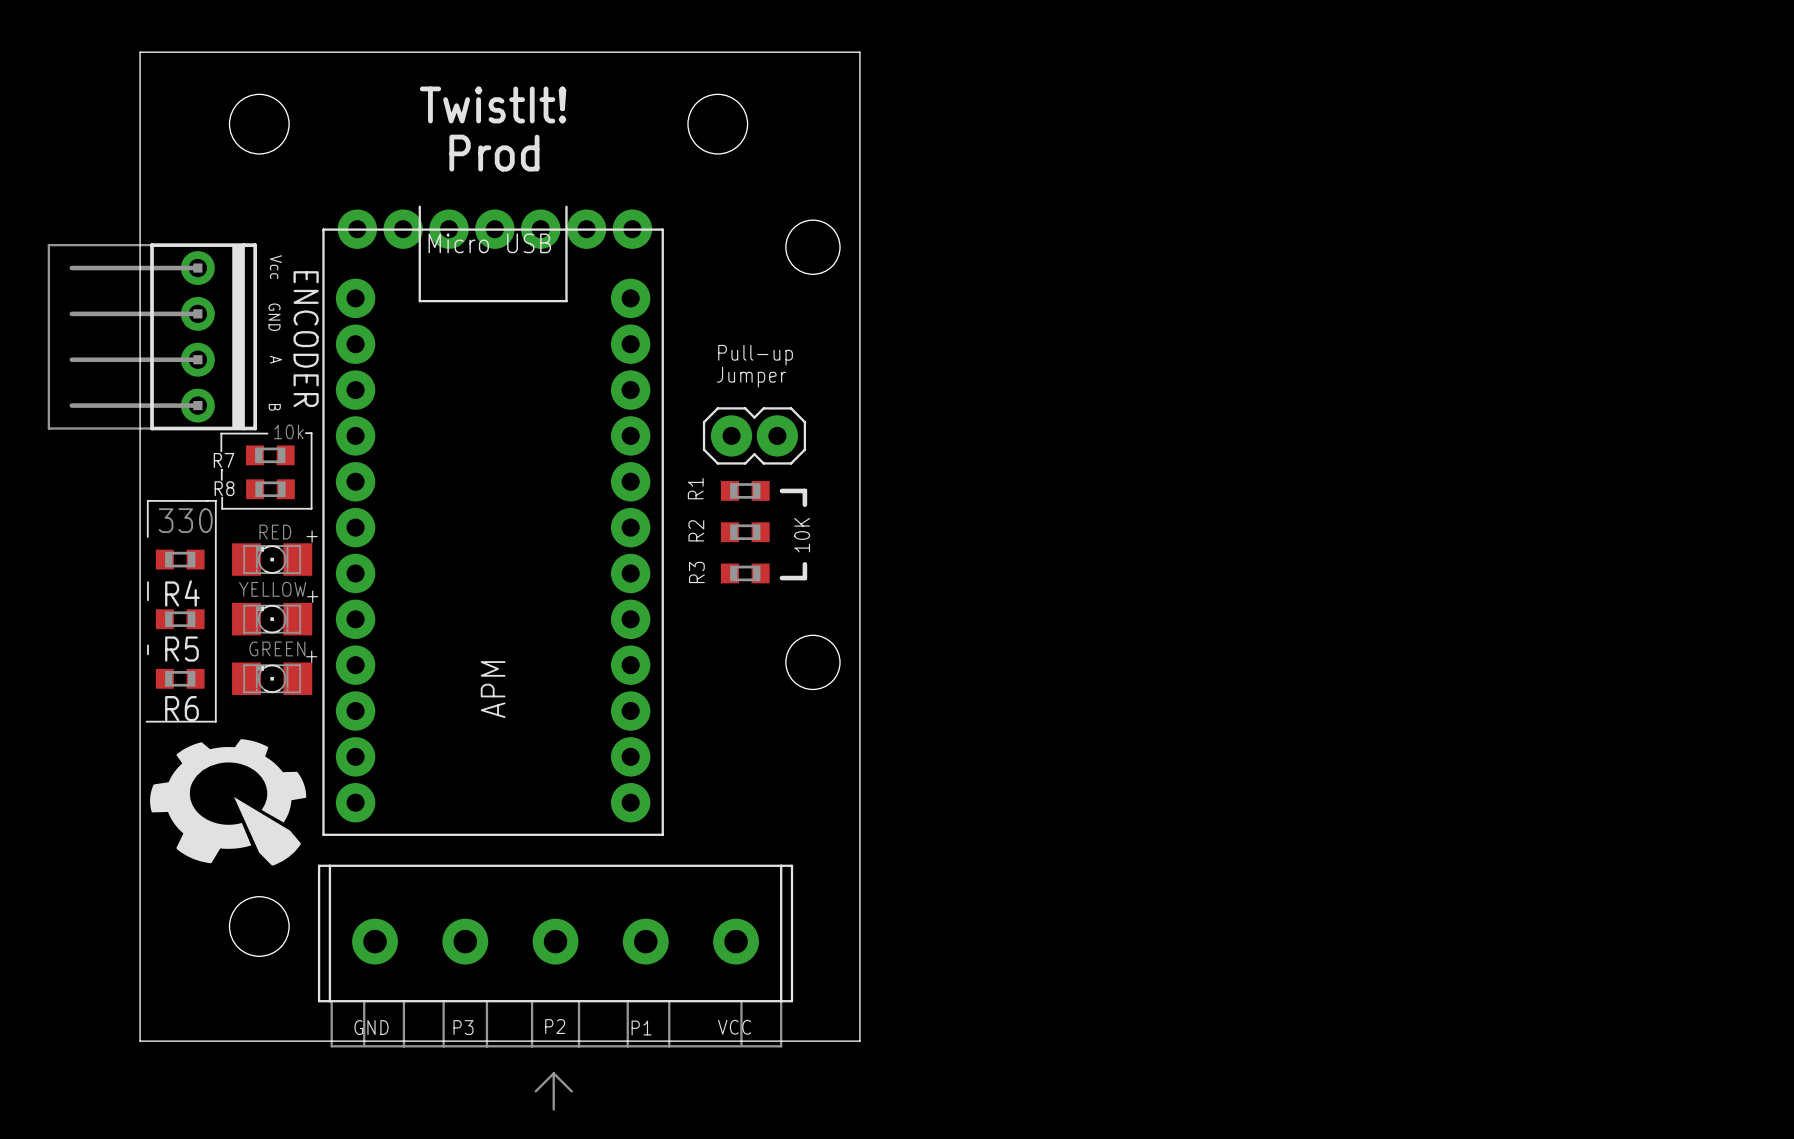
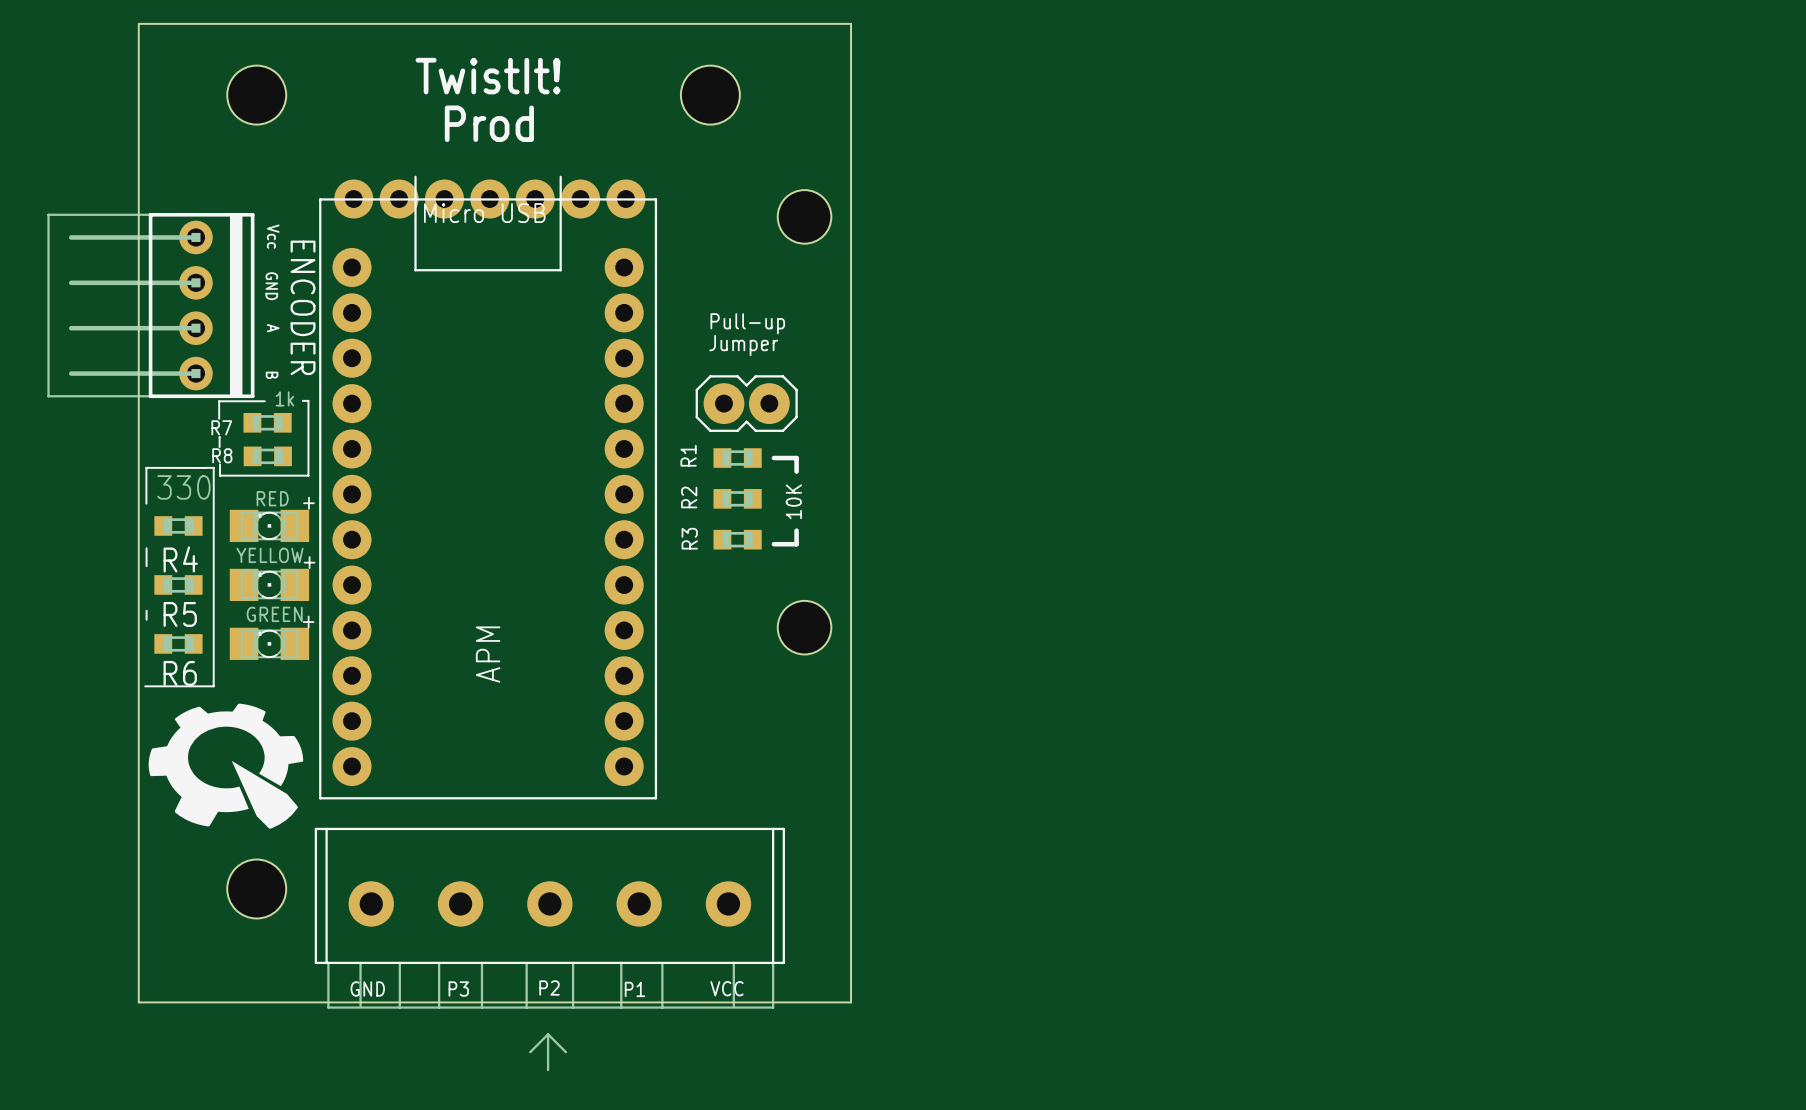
R7 value: 10k (288, 431) -> 1k (284, 398)

